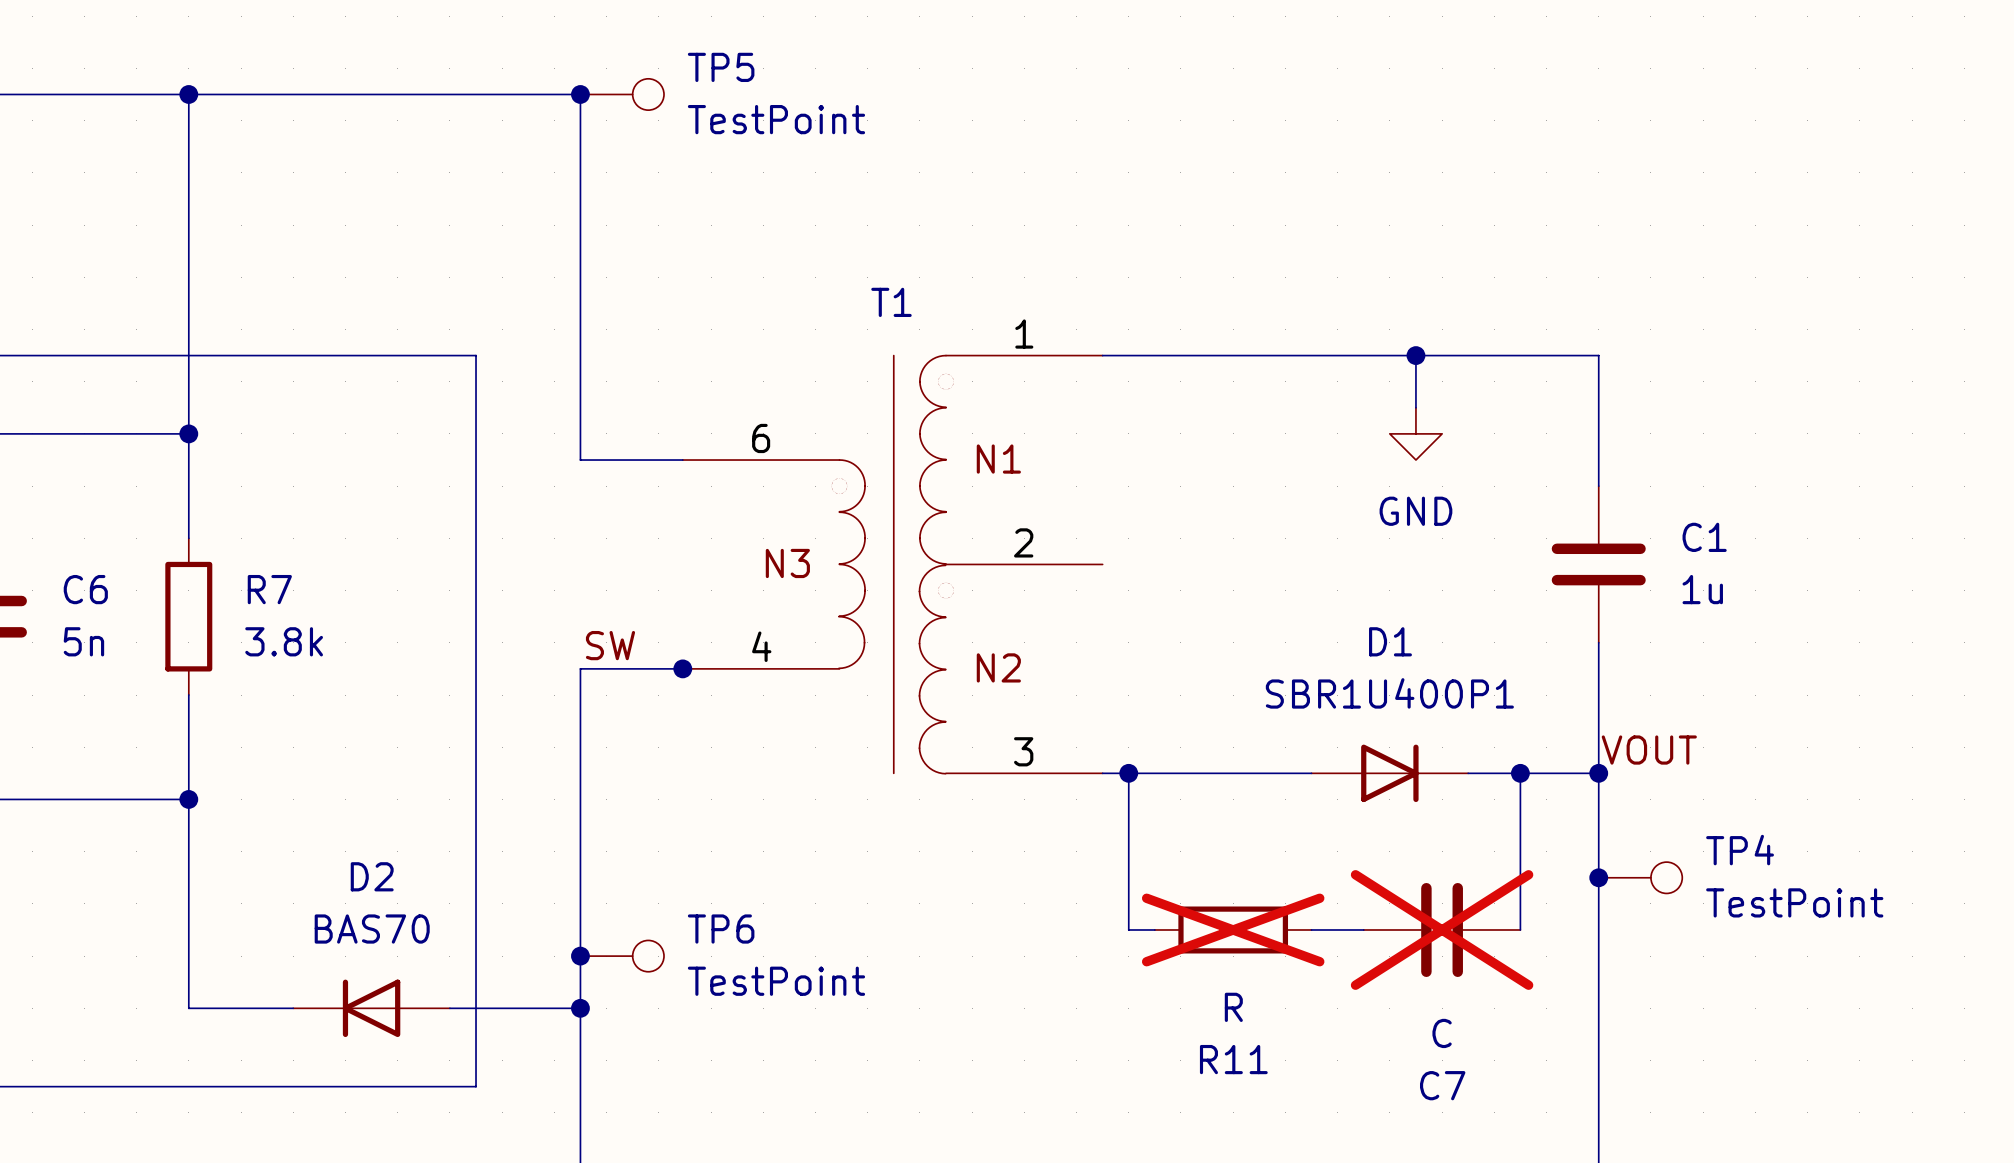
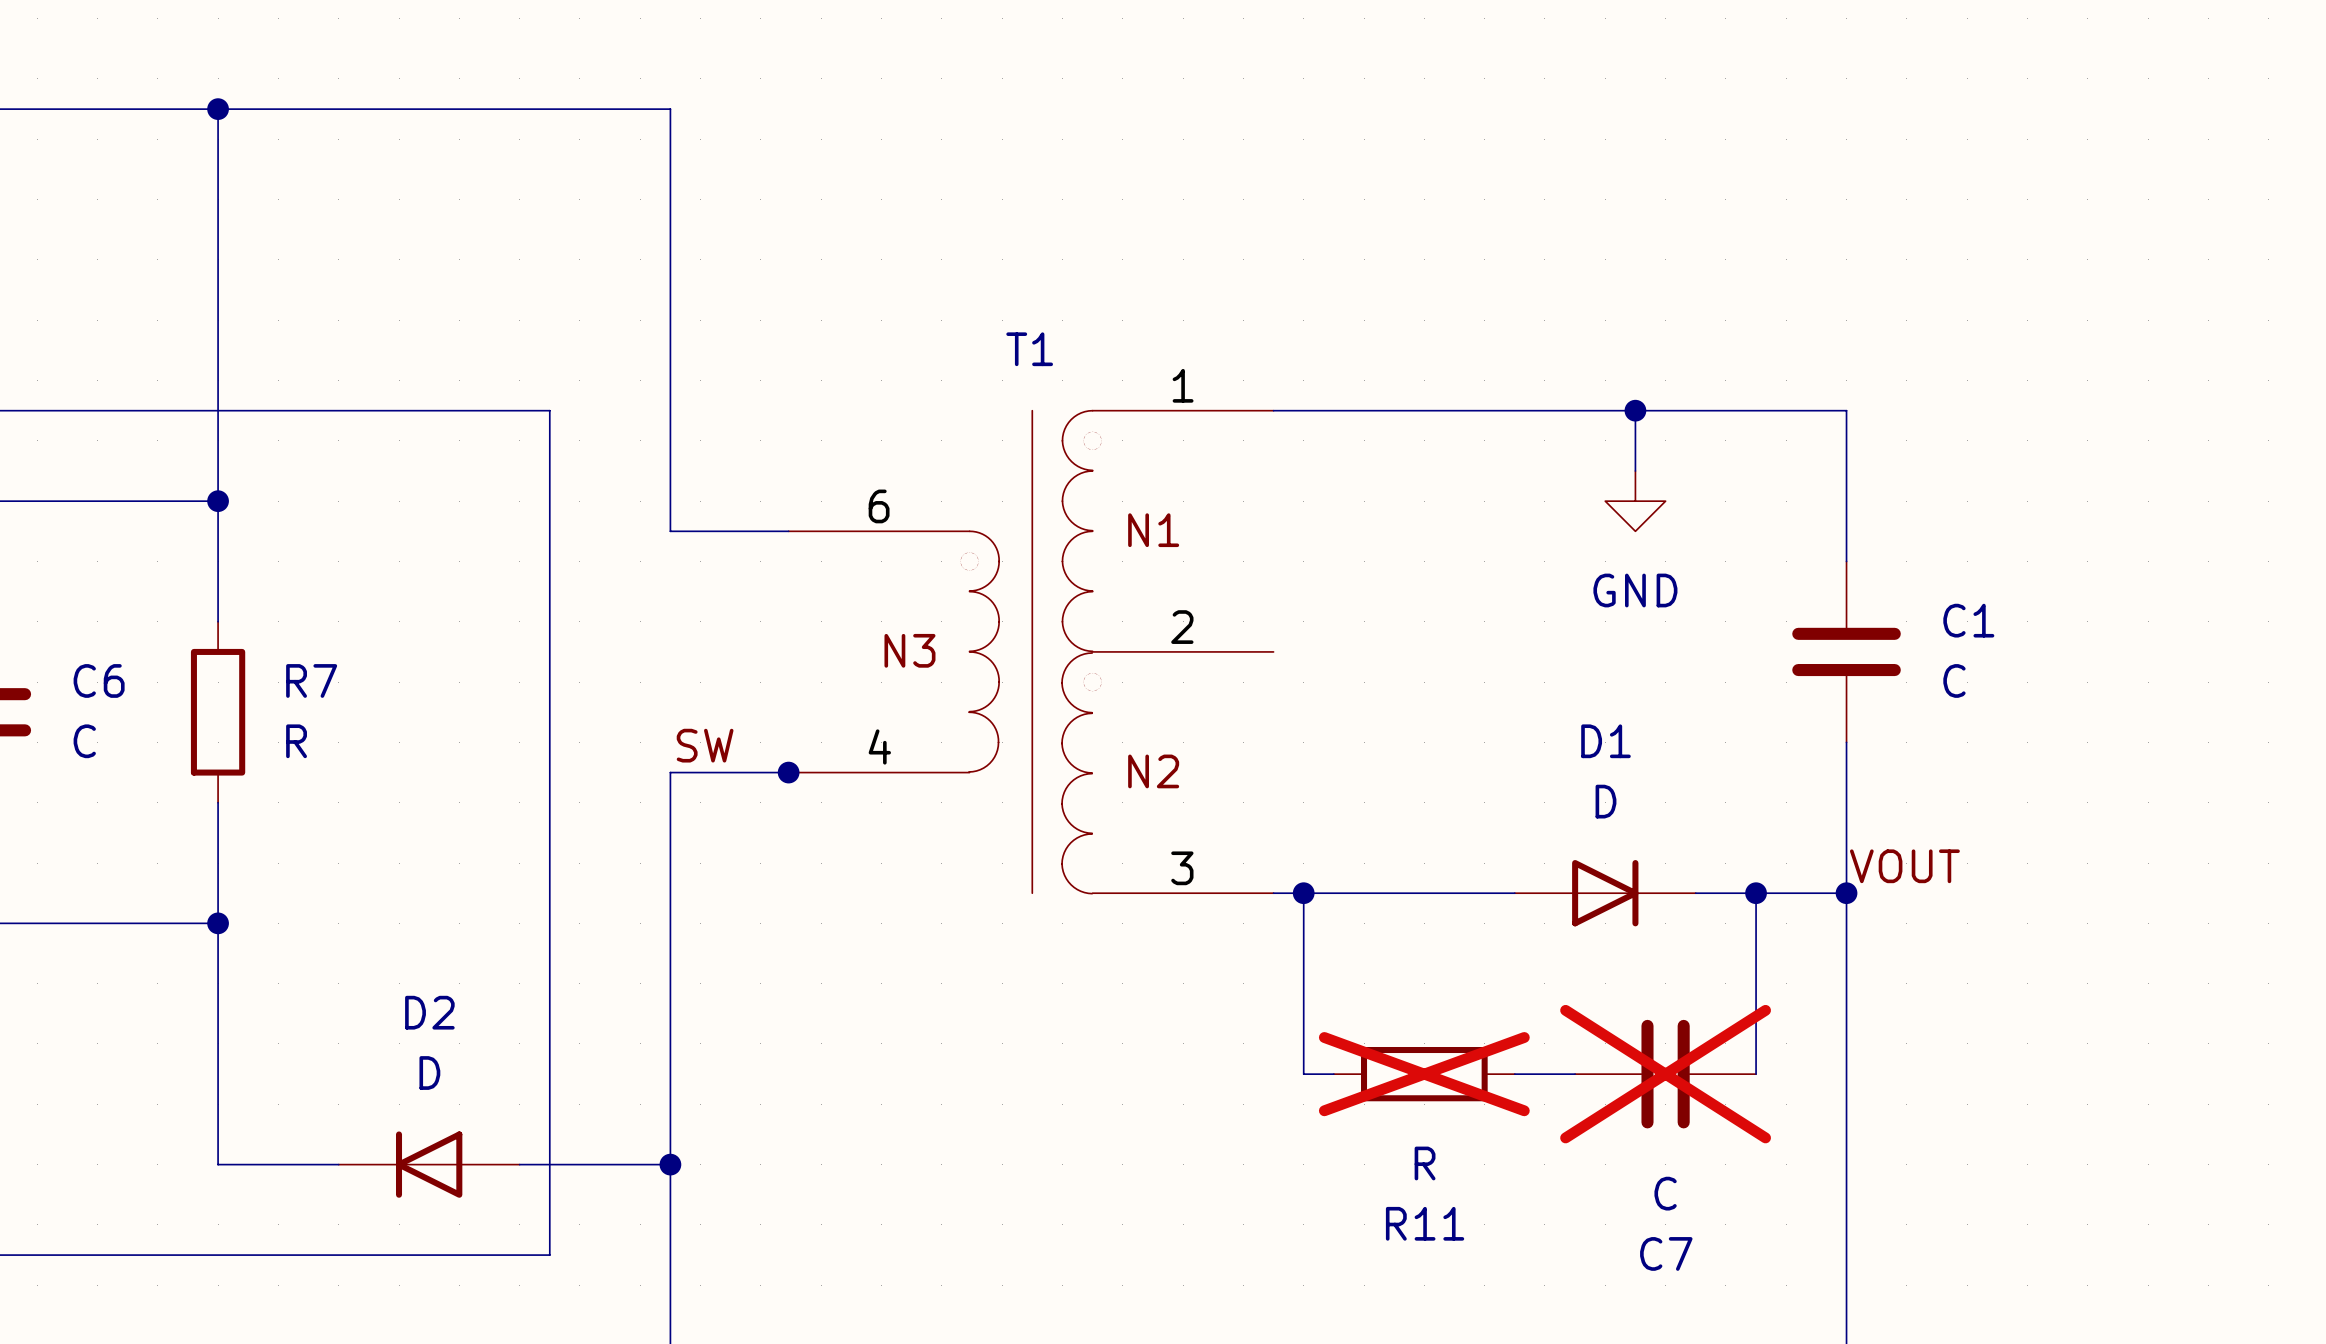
junction: (580, 94) -> none
TP5: TestPoint (622, 94) -> none
C1 value: 1u (1702, 589) -> C (1954, 680)
C6 value: 5n (83, 641) -> C (84, 741)
R7 value: 3.8k (284, 641) -> R (296, 741)
D1 value: SBR1U400P1 (1389, 693) -> D (1605, 801)
junction: (1598, 877) -> none
TP4: TestPoint (1640, 877) -> none
D2 value: BAS70 (372, 929) -> D (429, 1073)
junction: (580, 956) -> none
TP6: TestPoint (622, 956) -> none

